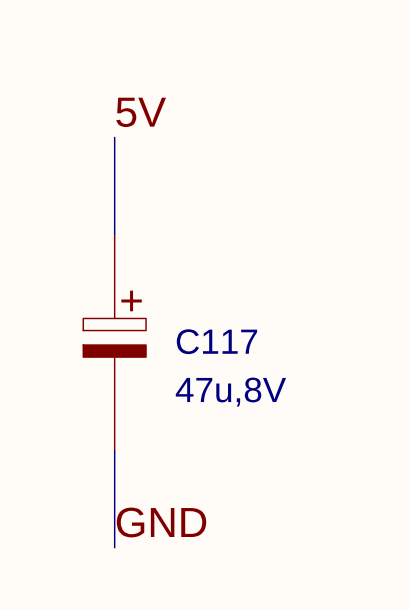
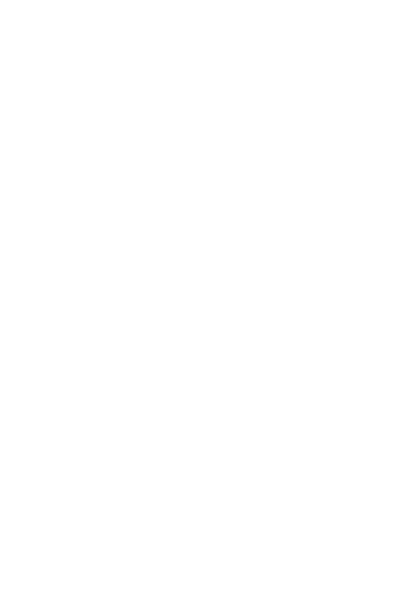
label: 5V (141, 112) -> none
wire: (114, 137) (114, 233) -> none
C117: 47u,8V (114, 342) -> none
wire: (114, 451) (114, 547) -> none
label: GND (161, 522) -> none

